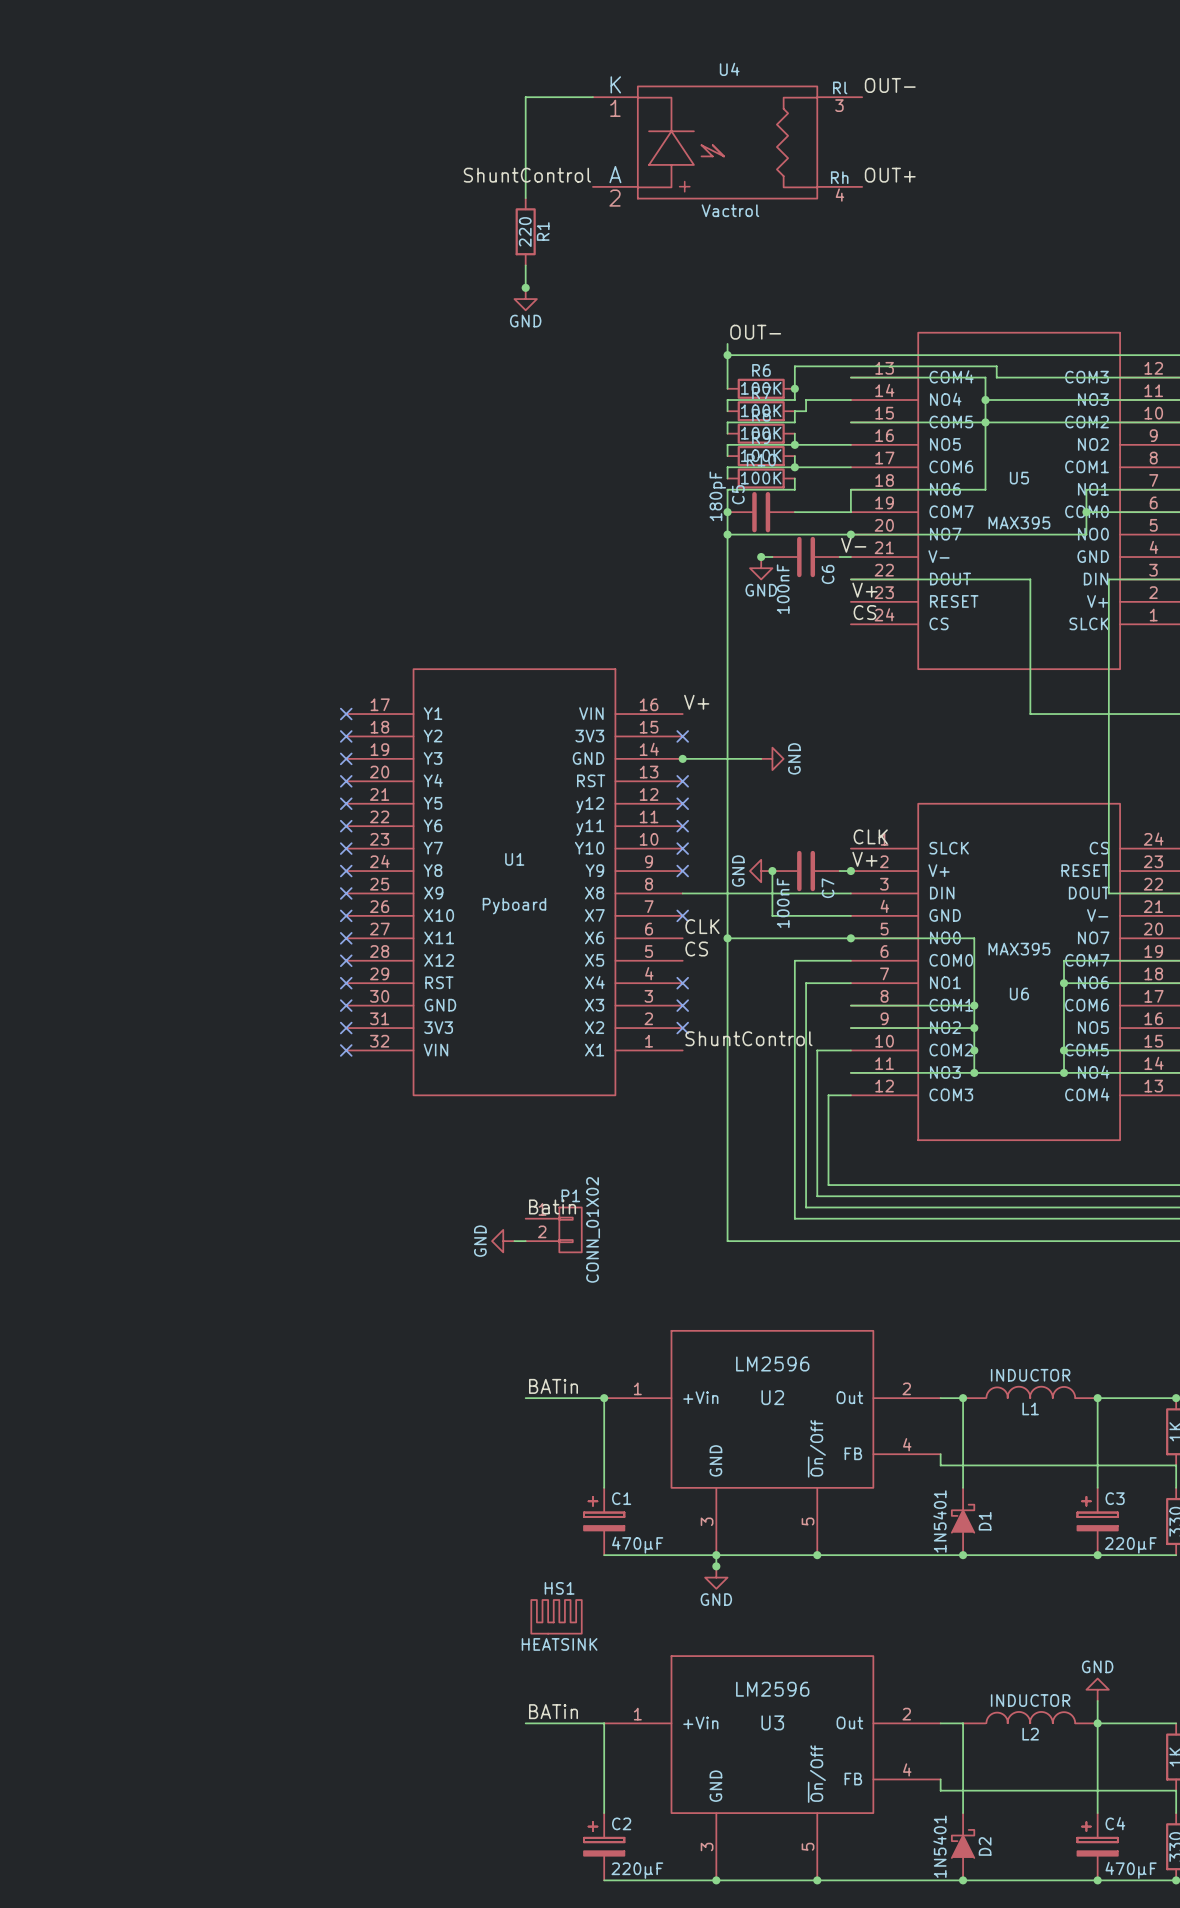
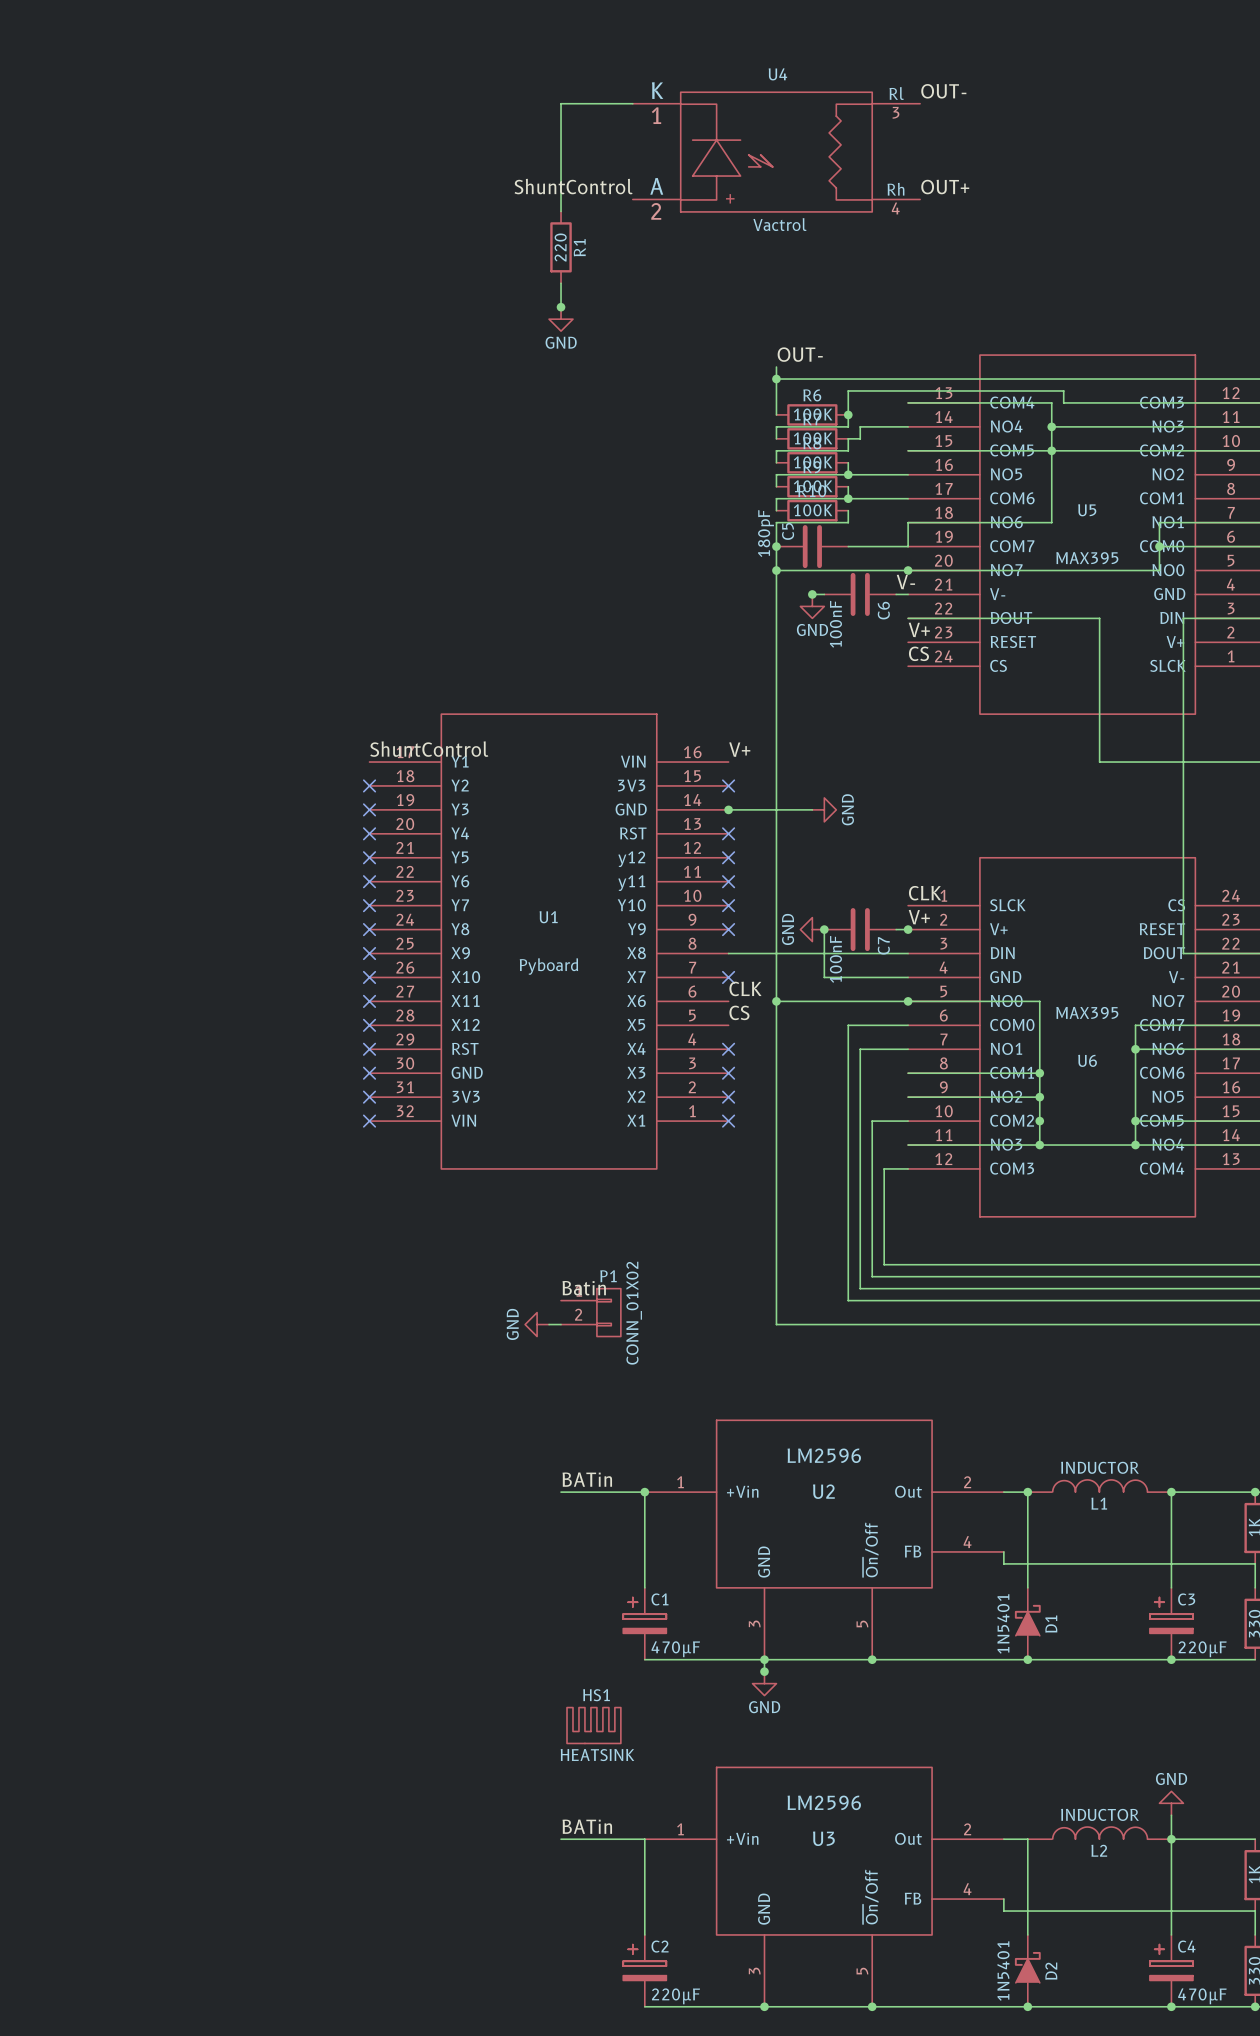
label: none -> ShuntControl (429, 749)
no-connect mark: (346, 714) -> none
label: ShuntControl (748, 1038) -> none
no-connect mark: none -> (728, 1121)

